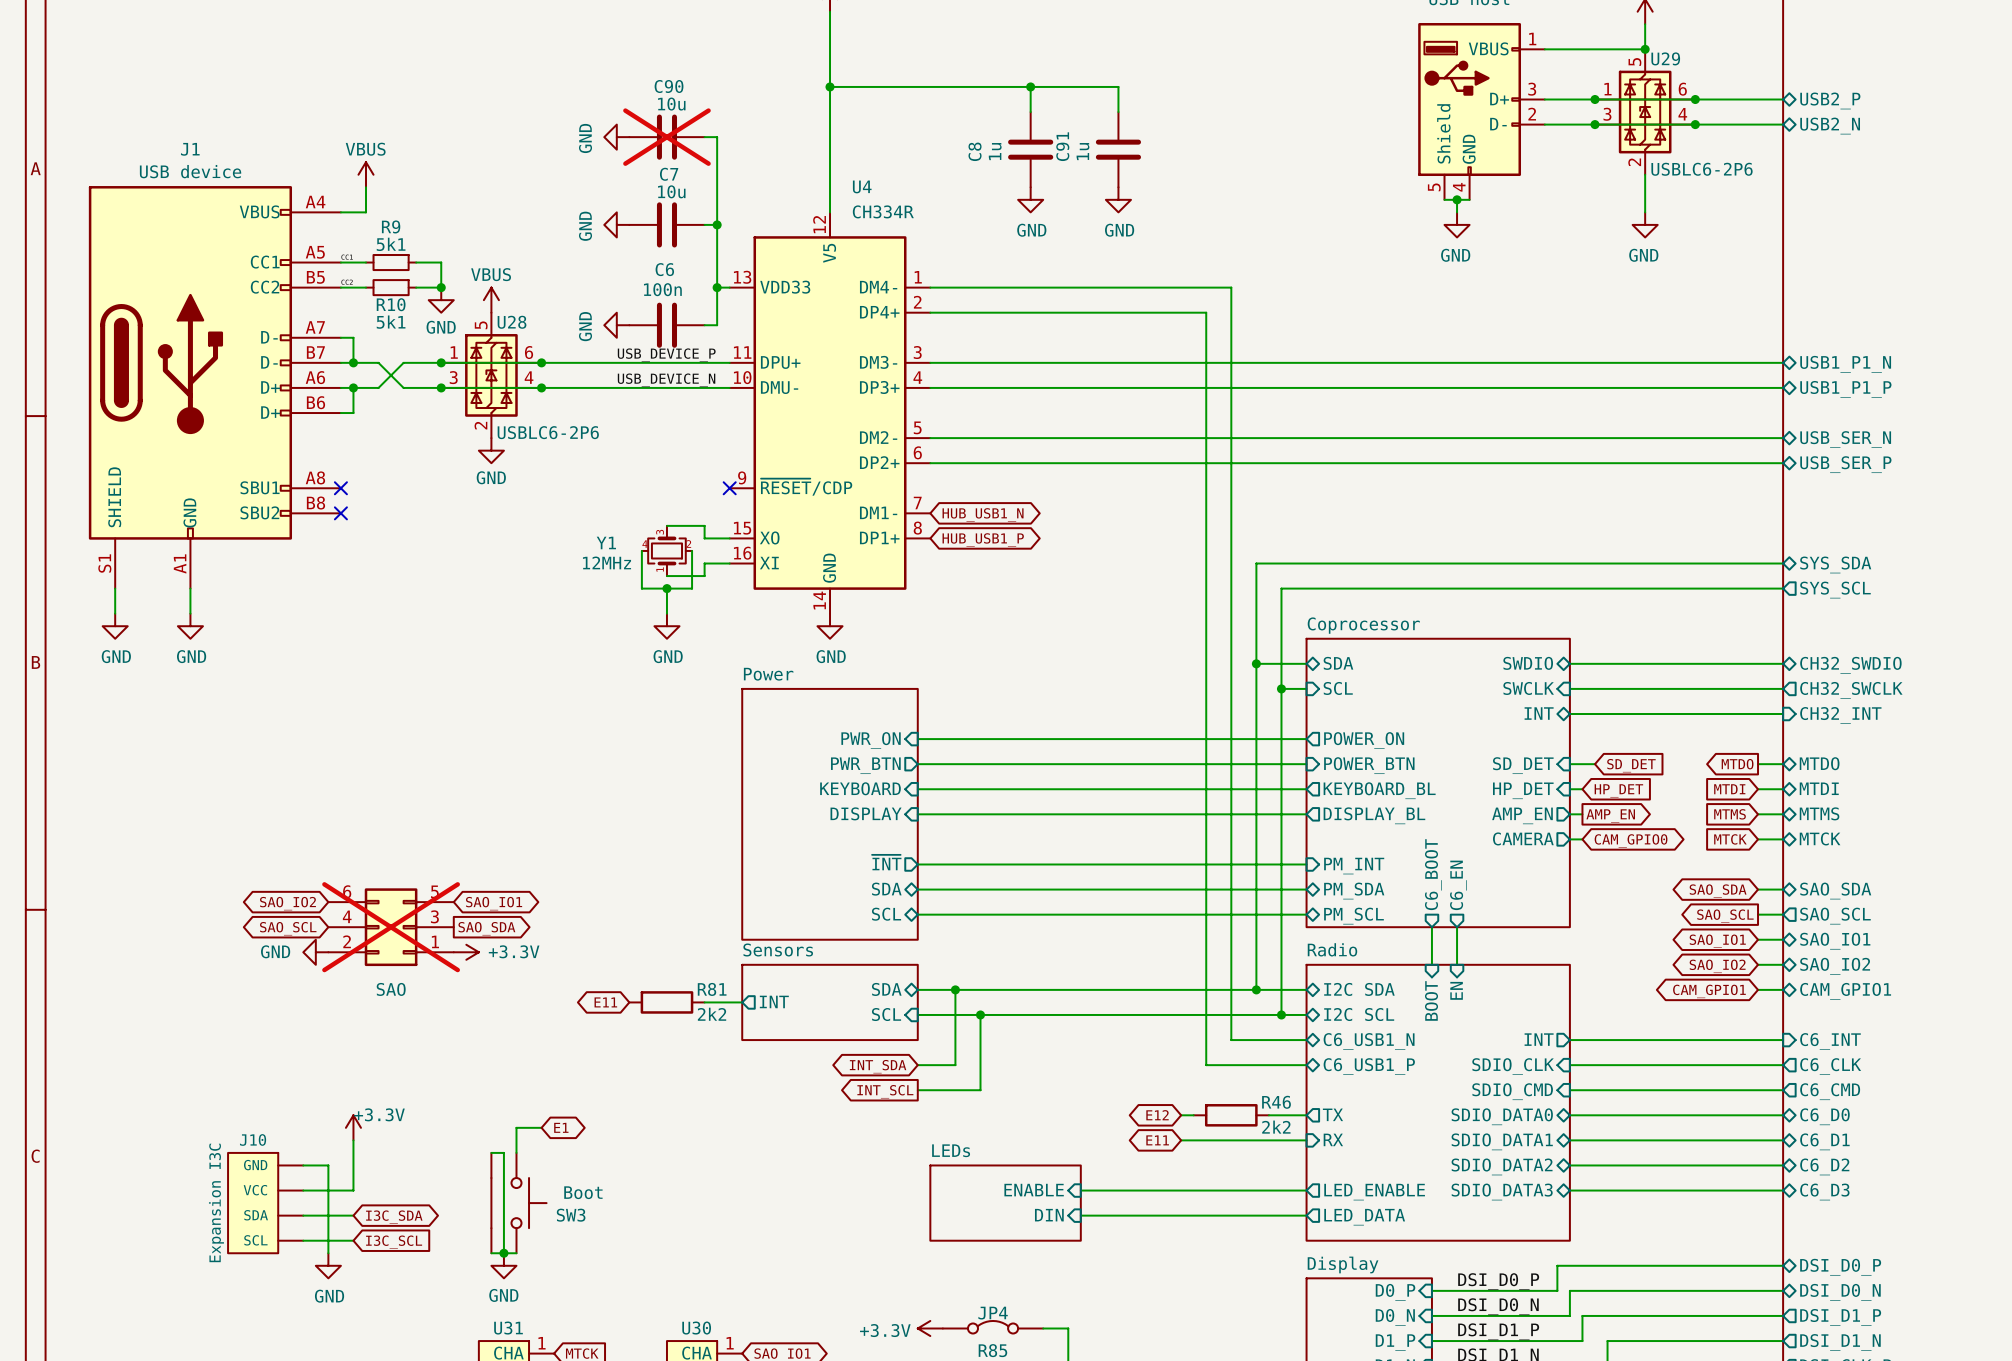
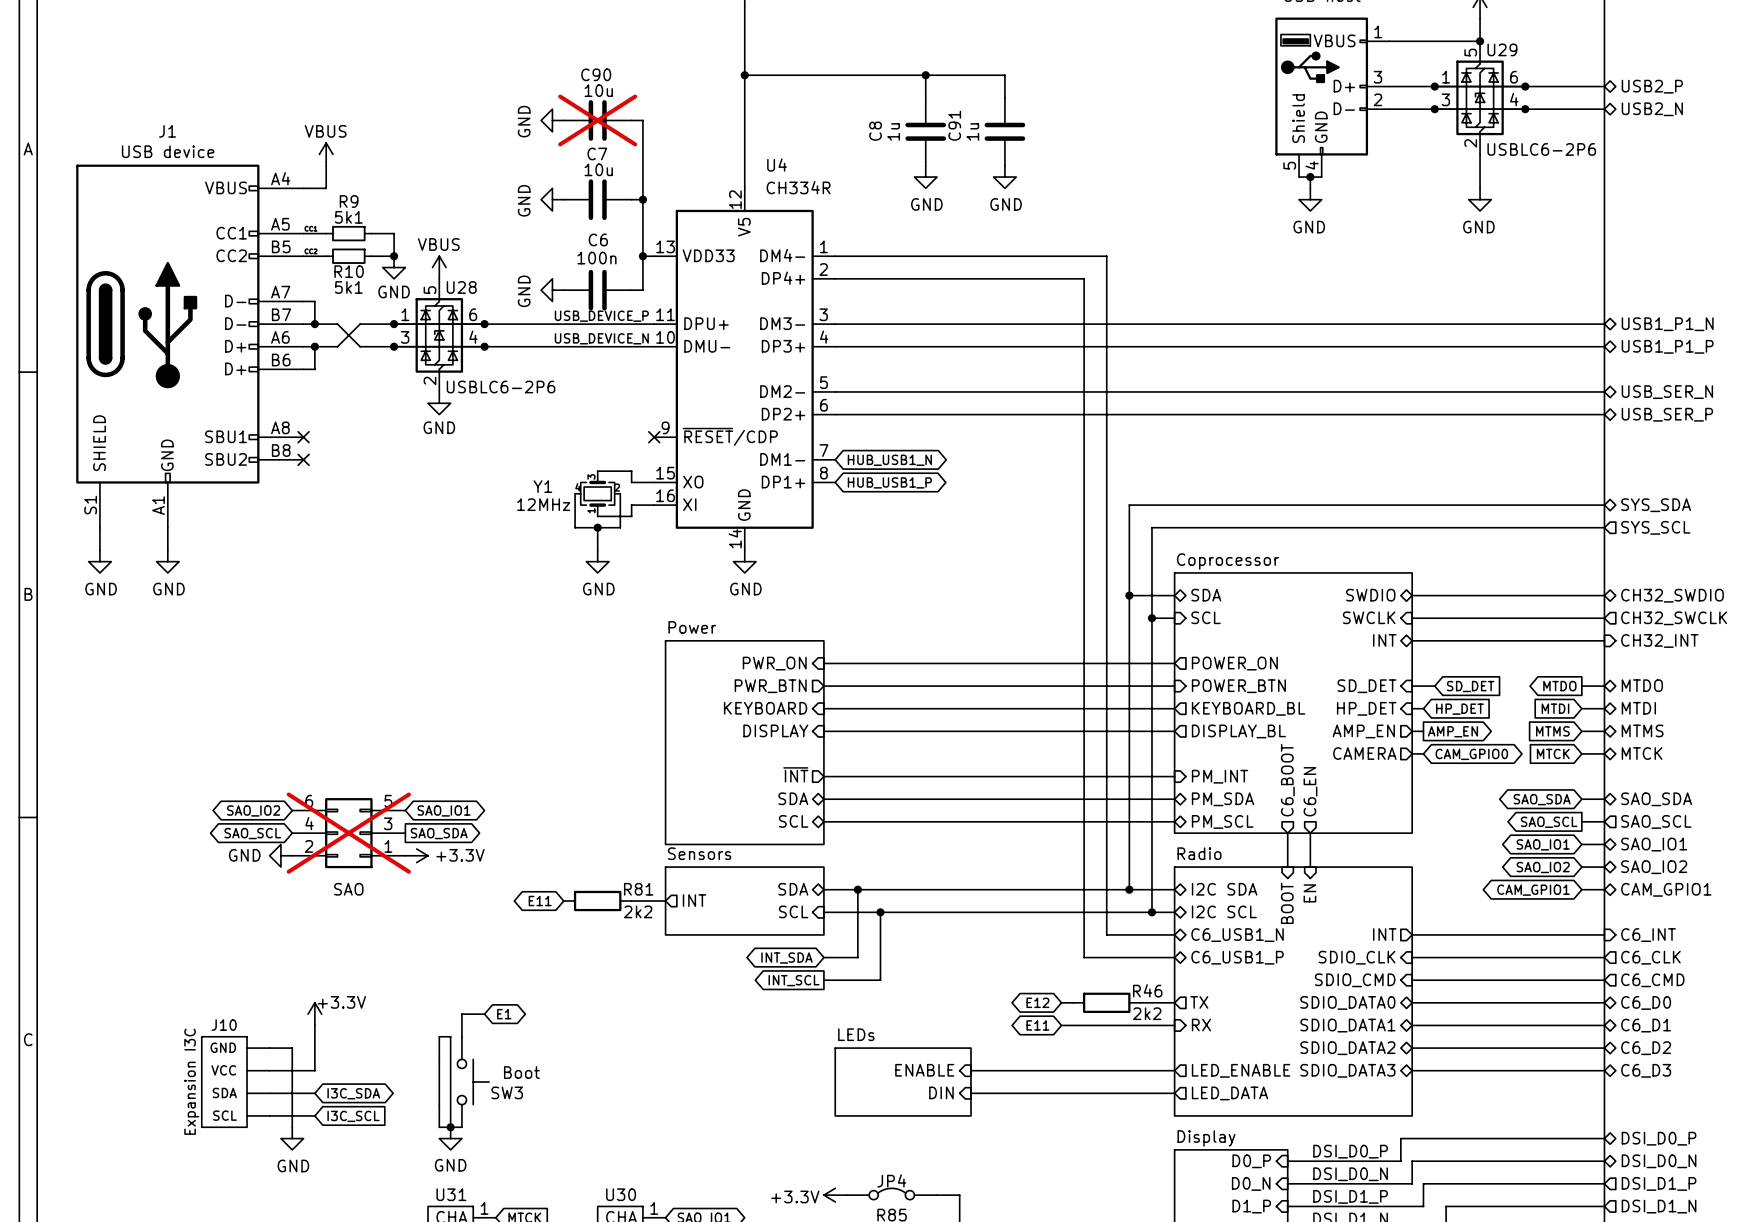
sheet Power: (830, 814) -> none
sheet Power: none -> (744, 742)

